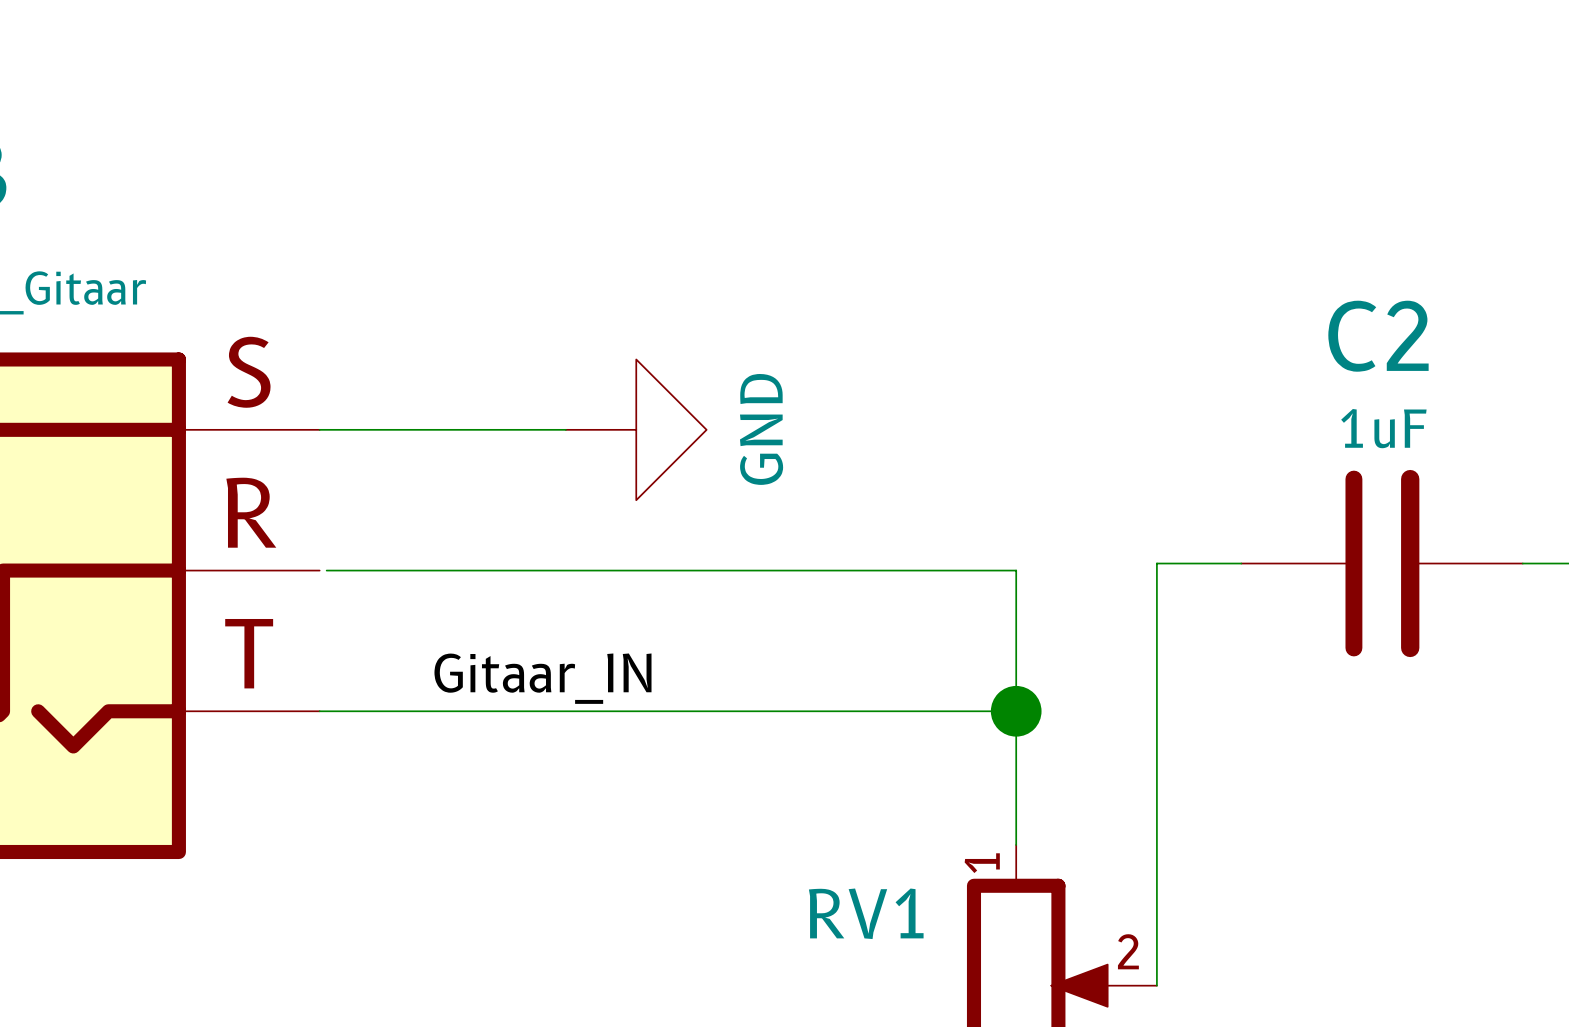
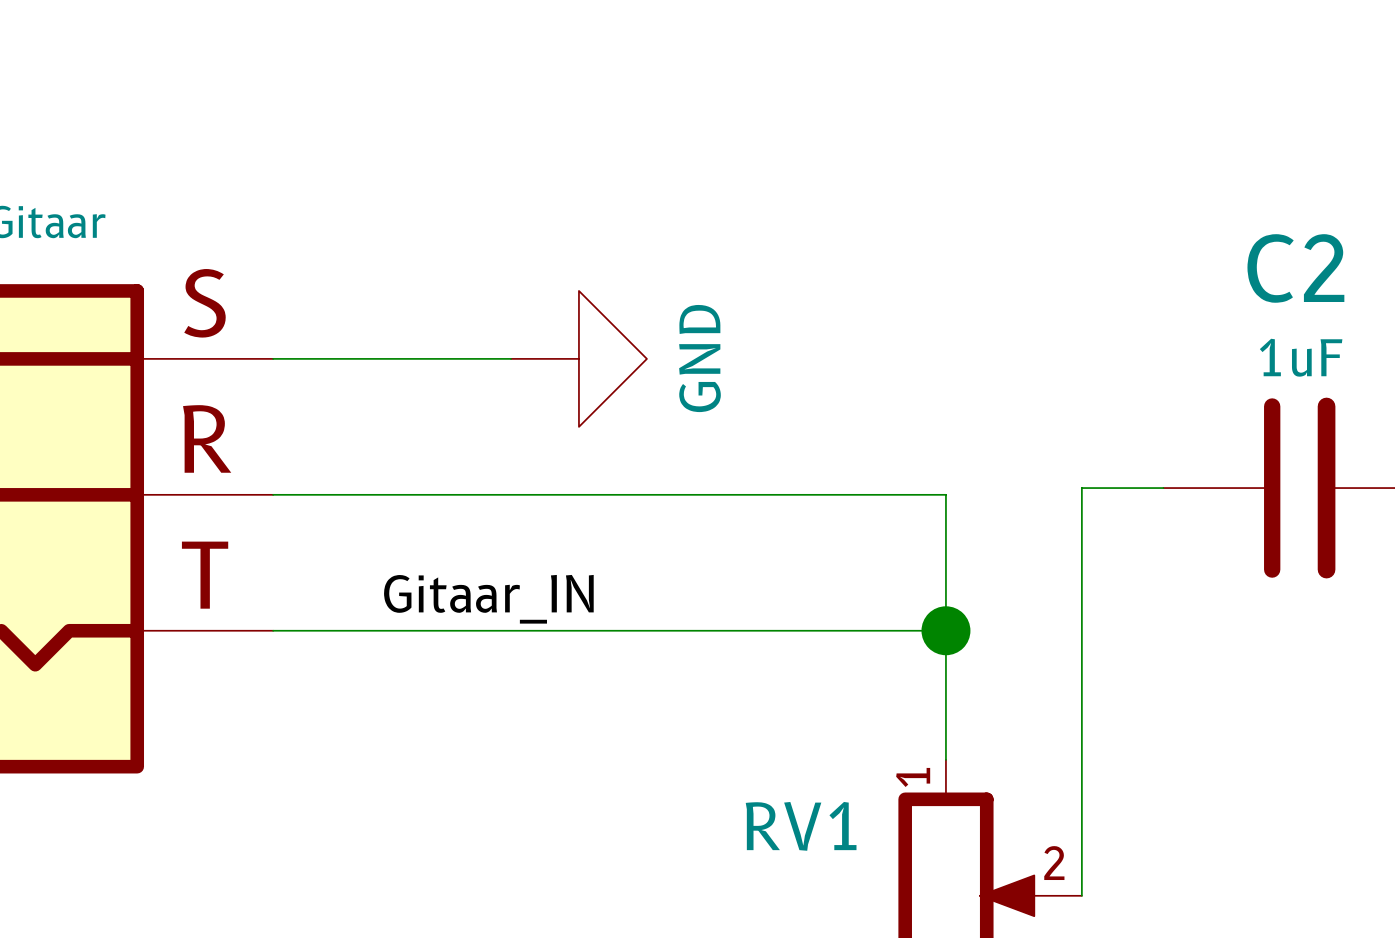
wire: none -> (273, 494) (279, 494)

